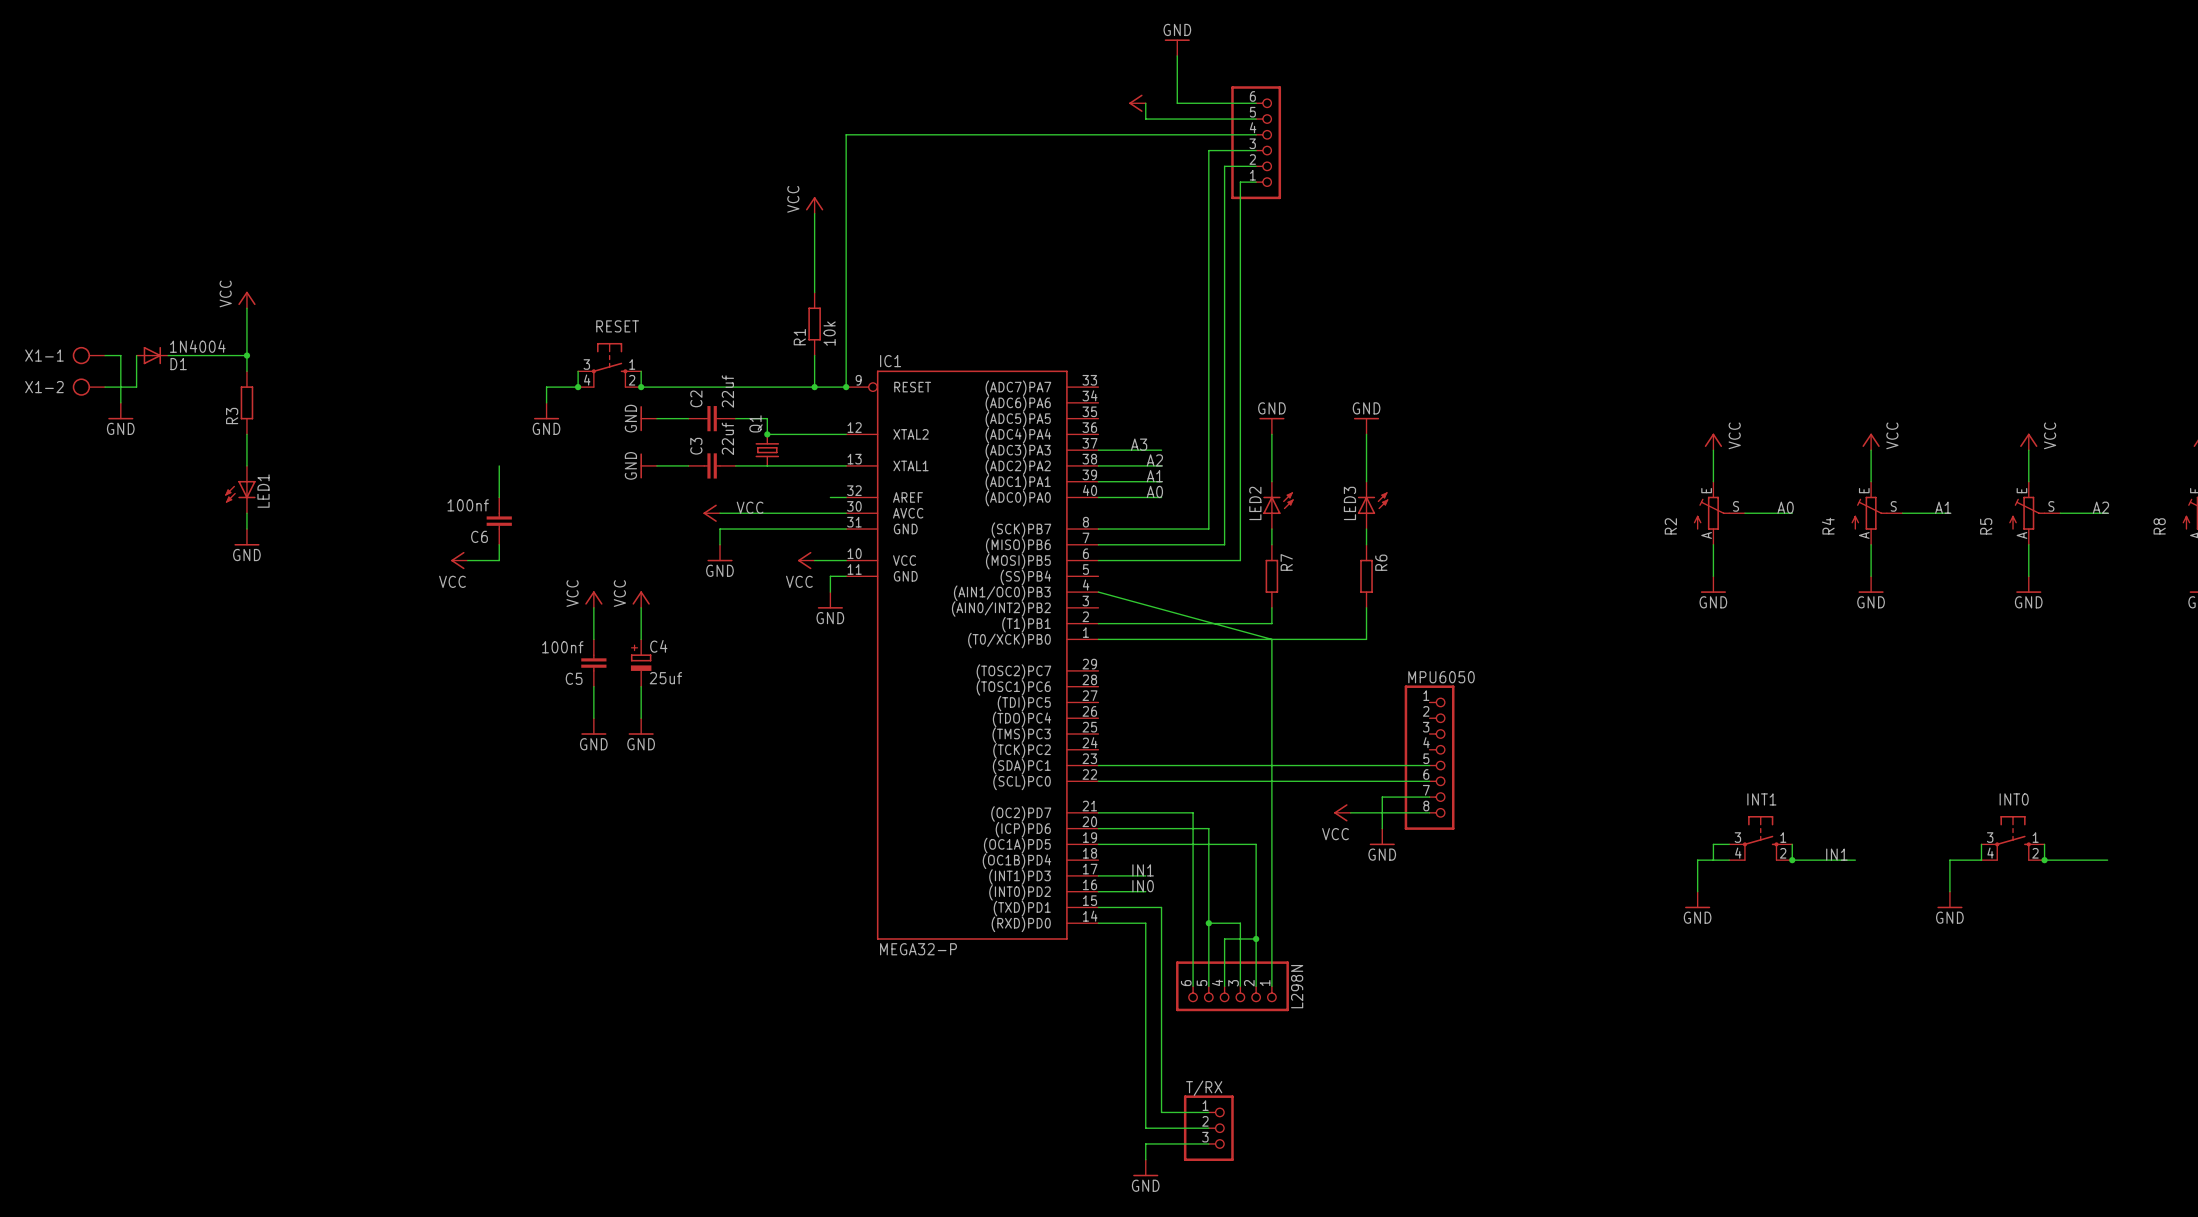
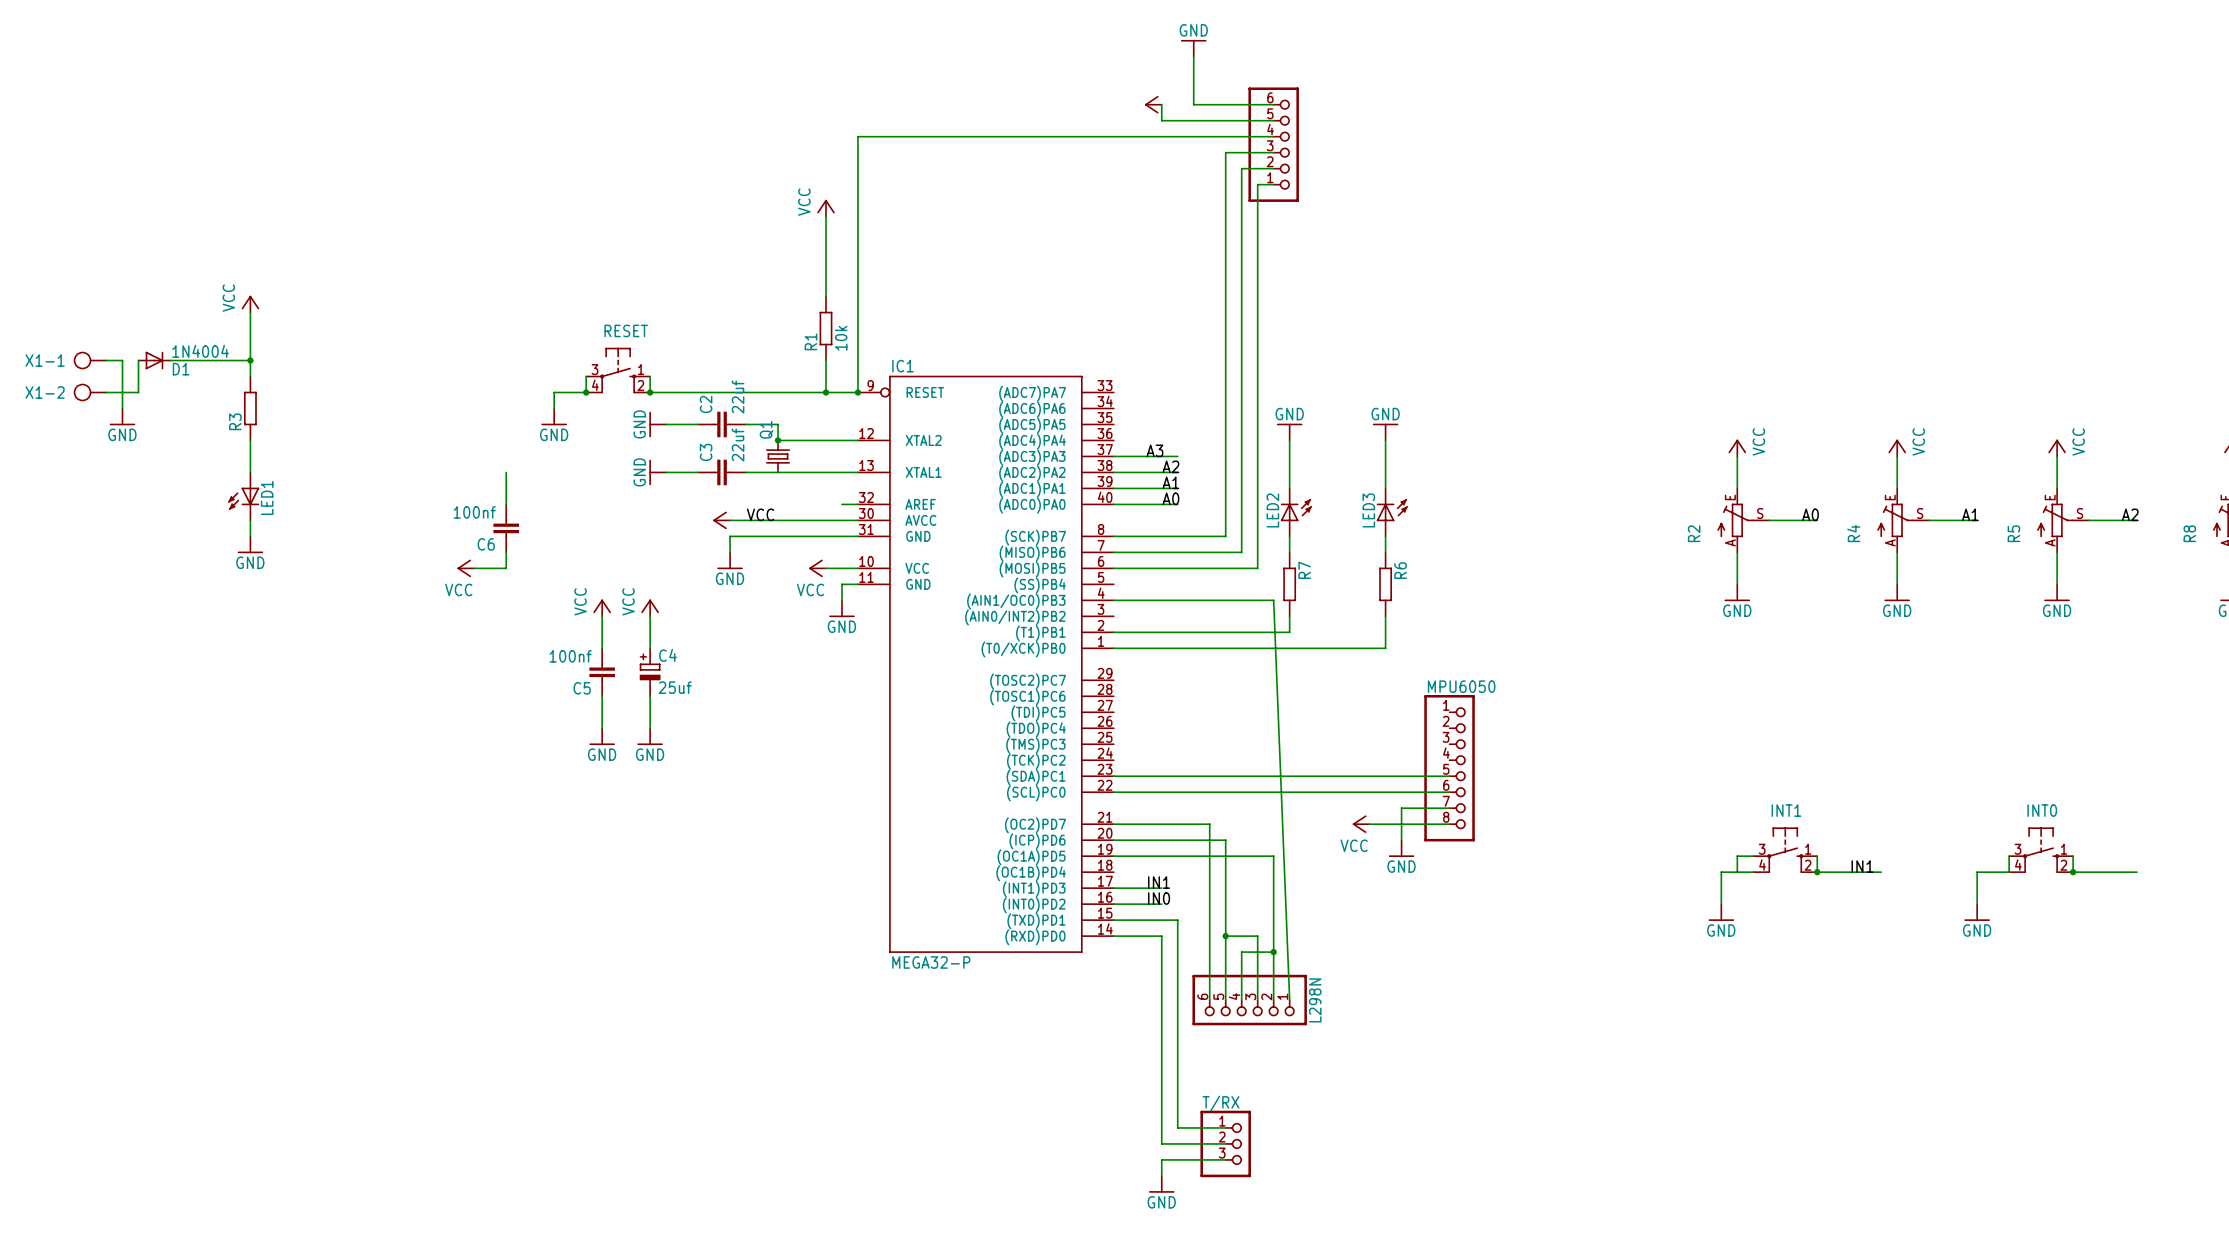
wire: (1098, 592) (1271, 639) (1271, 986) -> (1113, 600) (1273, 600) (1289, 1000)

